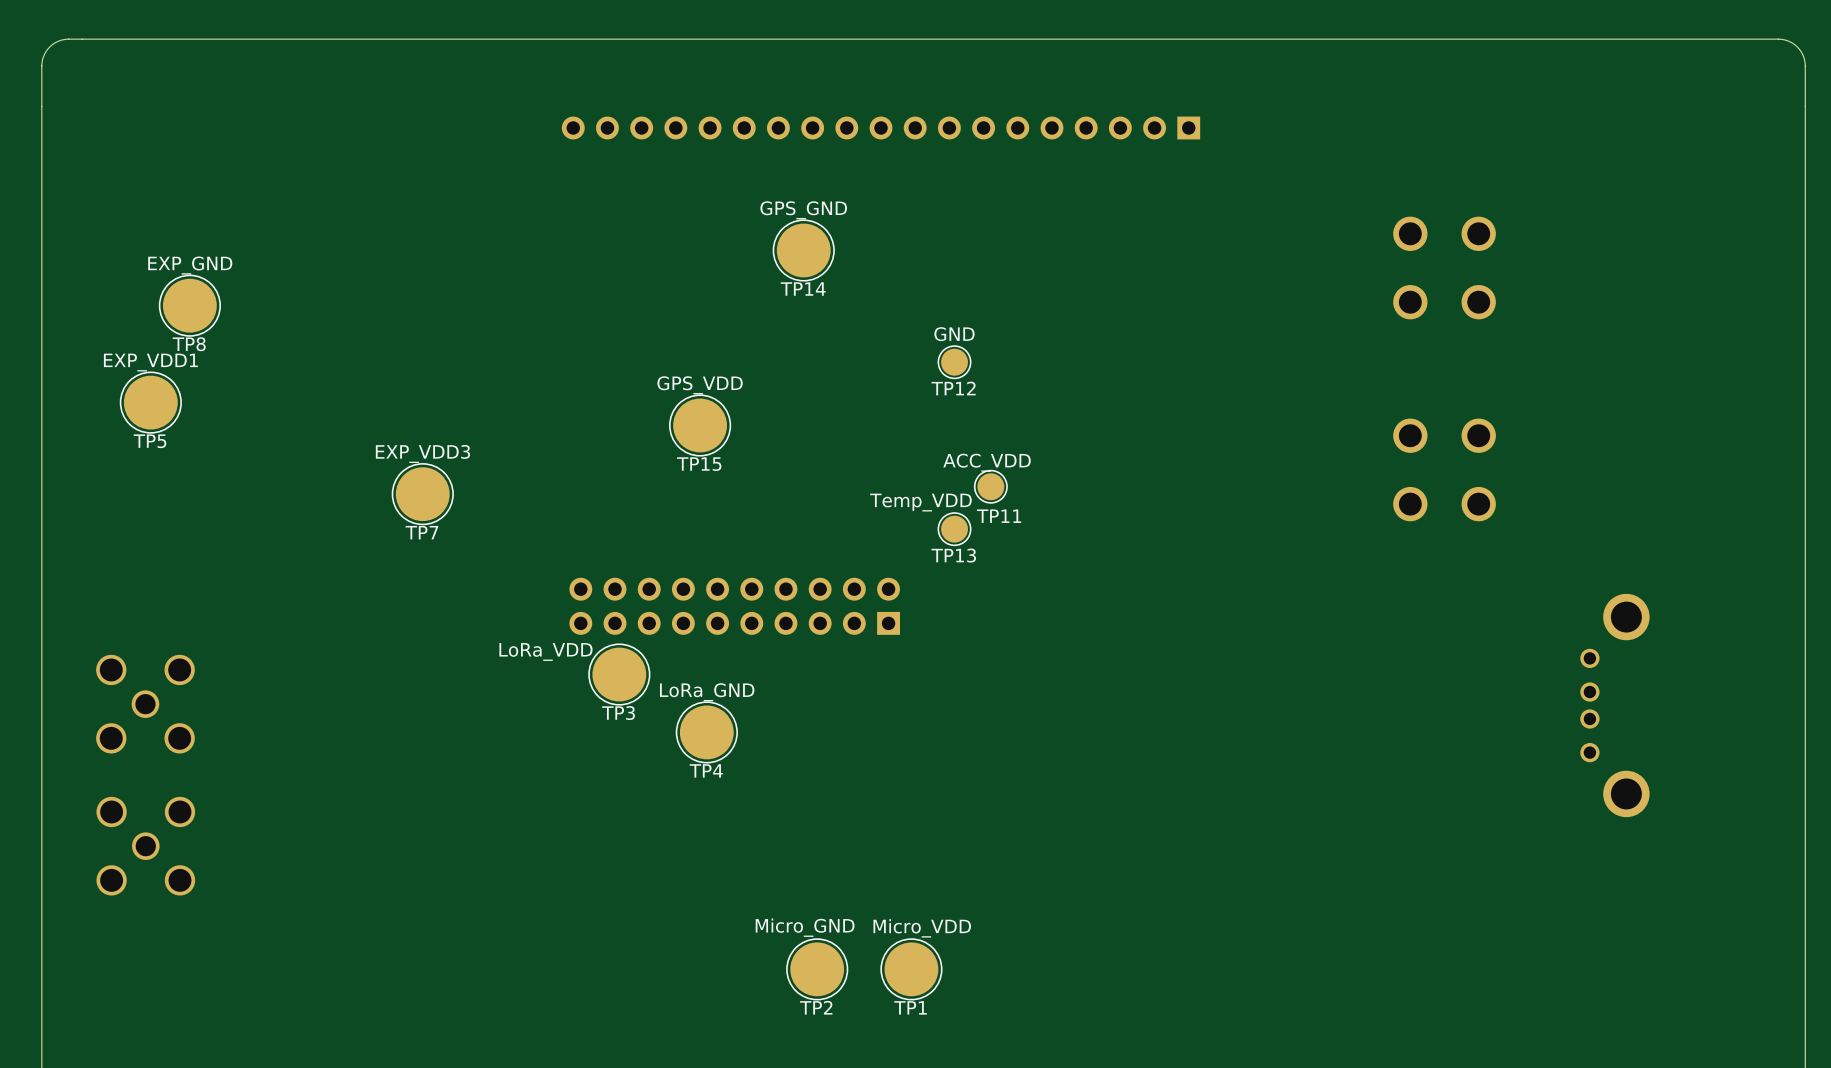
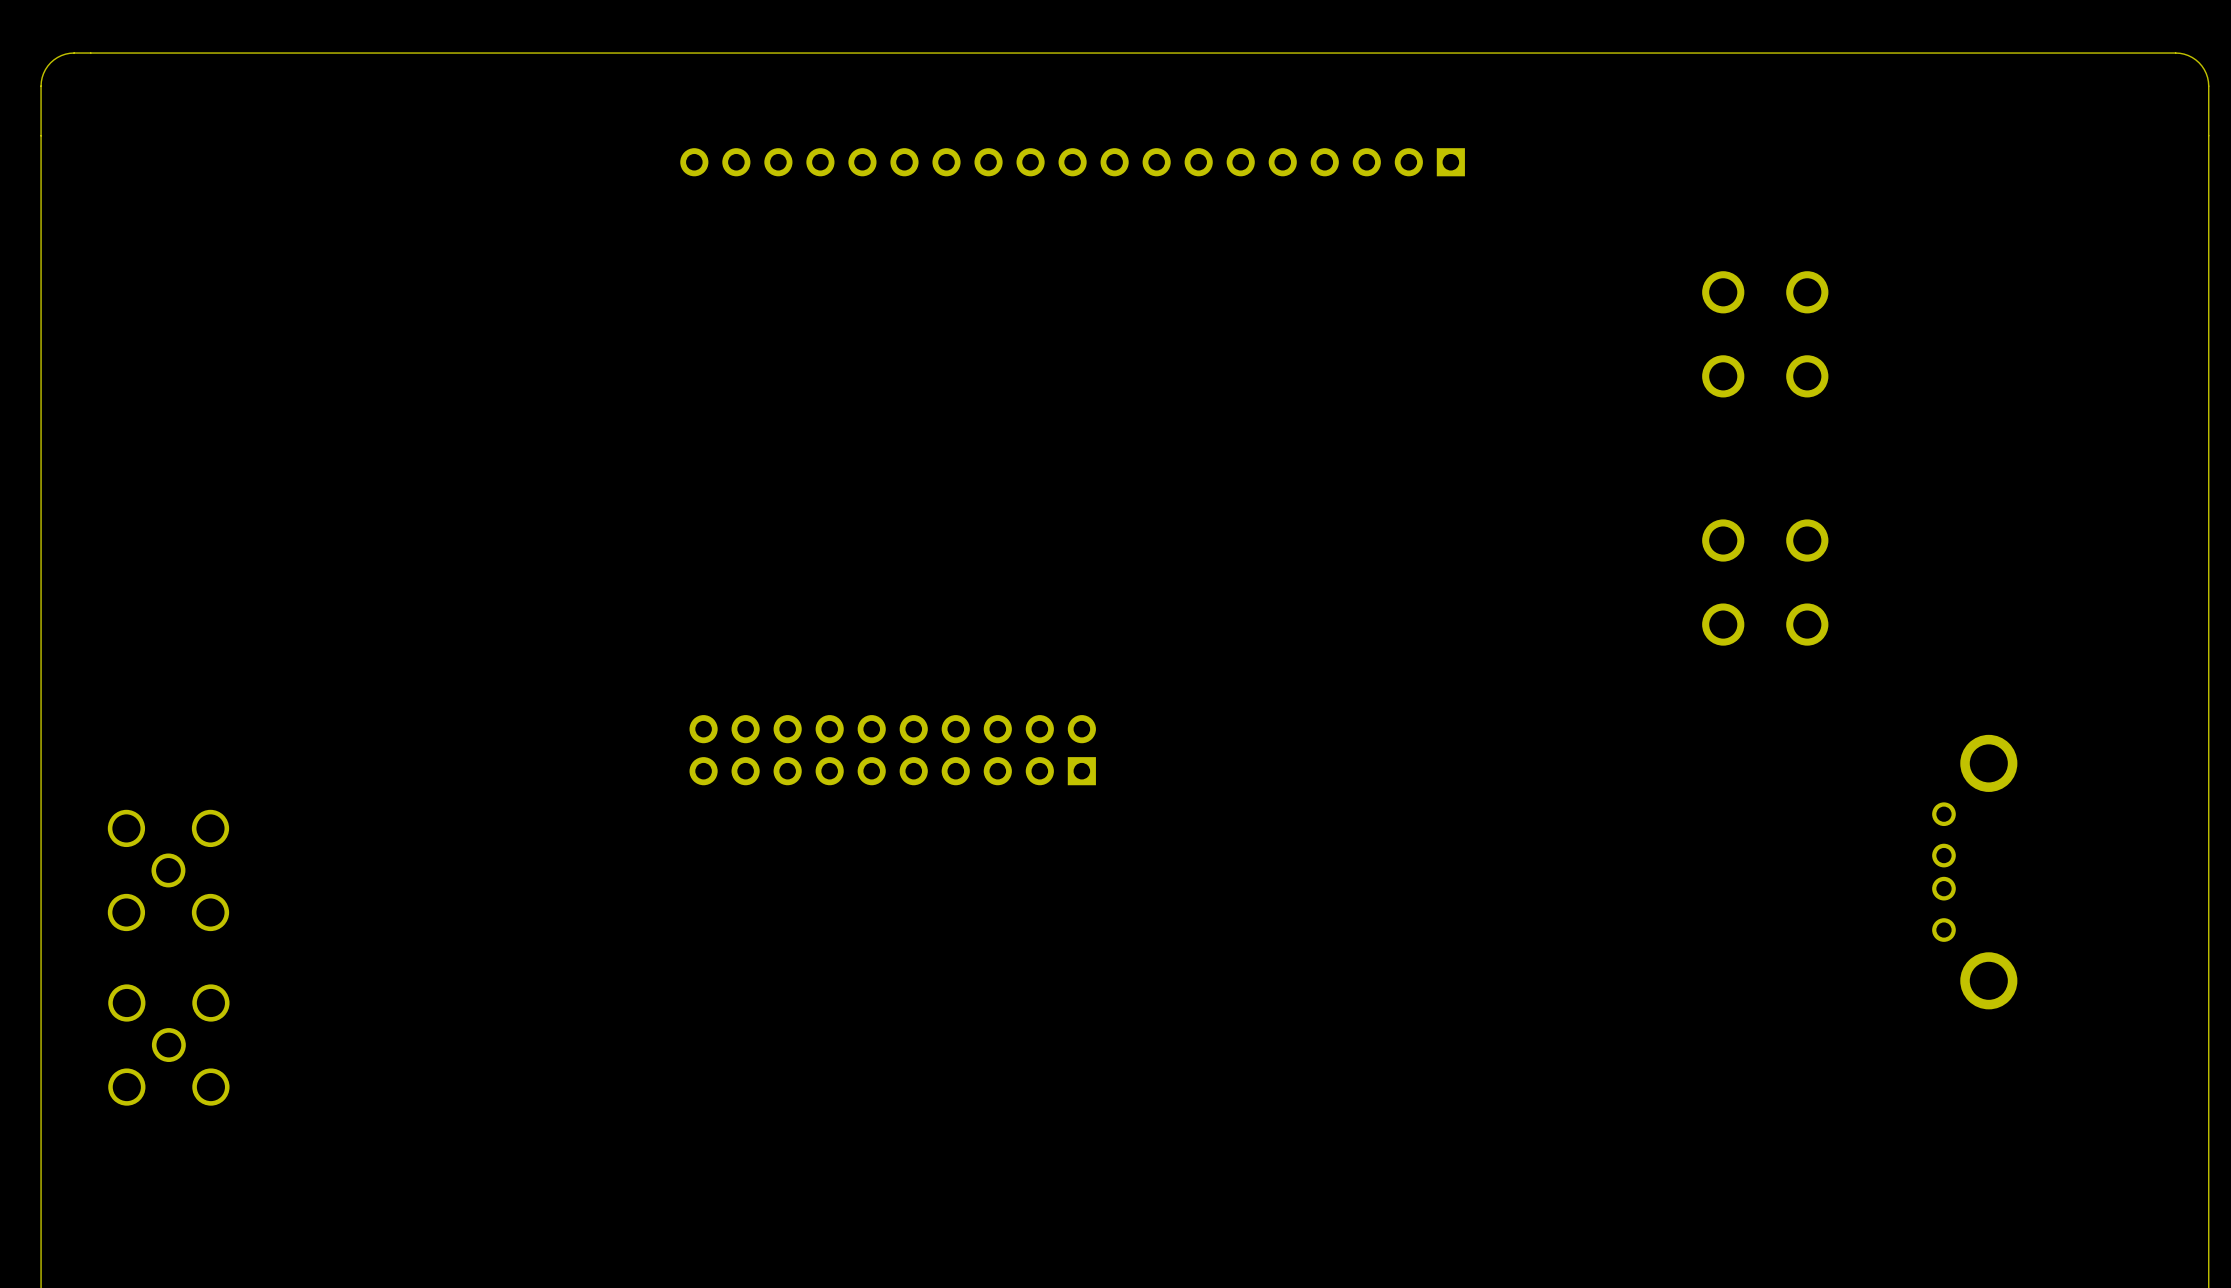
TP14: GPS_GND (803, 250) -> none
TP8: EXP_GND (189, 305) -> none
TP12: GND (954, 362) -> none
TP5: EXP_VDD1 (150, 402) -> none
TP15: GPS_VDD (700, 425) -> none
TP11: ACC_VDD (990, 486) -> none
TP7: EXP_VDD3 (422, 494) -> none
TP13: Temp_VDD (954, 529) -> none
TP3: LoRa_VDD (619, 674) -> none
TP4: LoRa_GND (706, 732) -> none
TP2: Micro_GND (817, 969) -> none
TP1: Micro_VDD (911, 969) -> none

